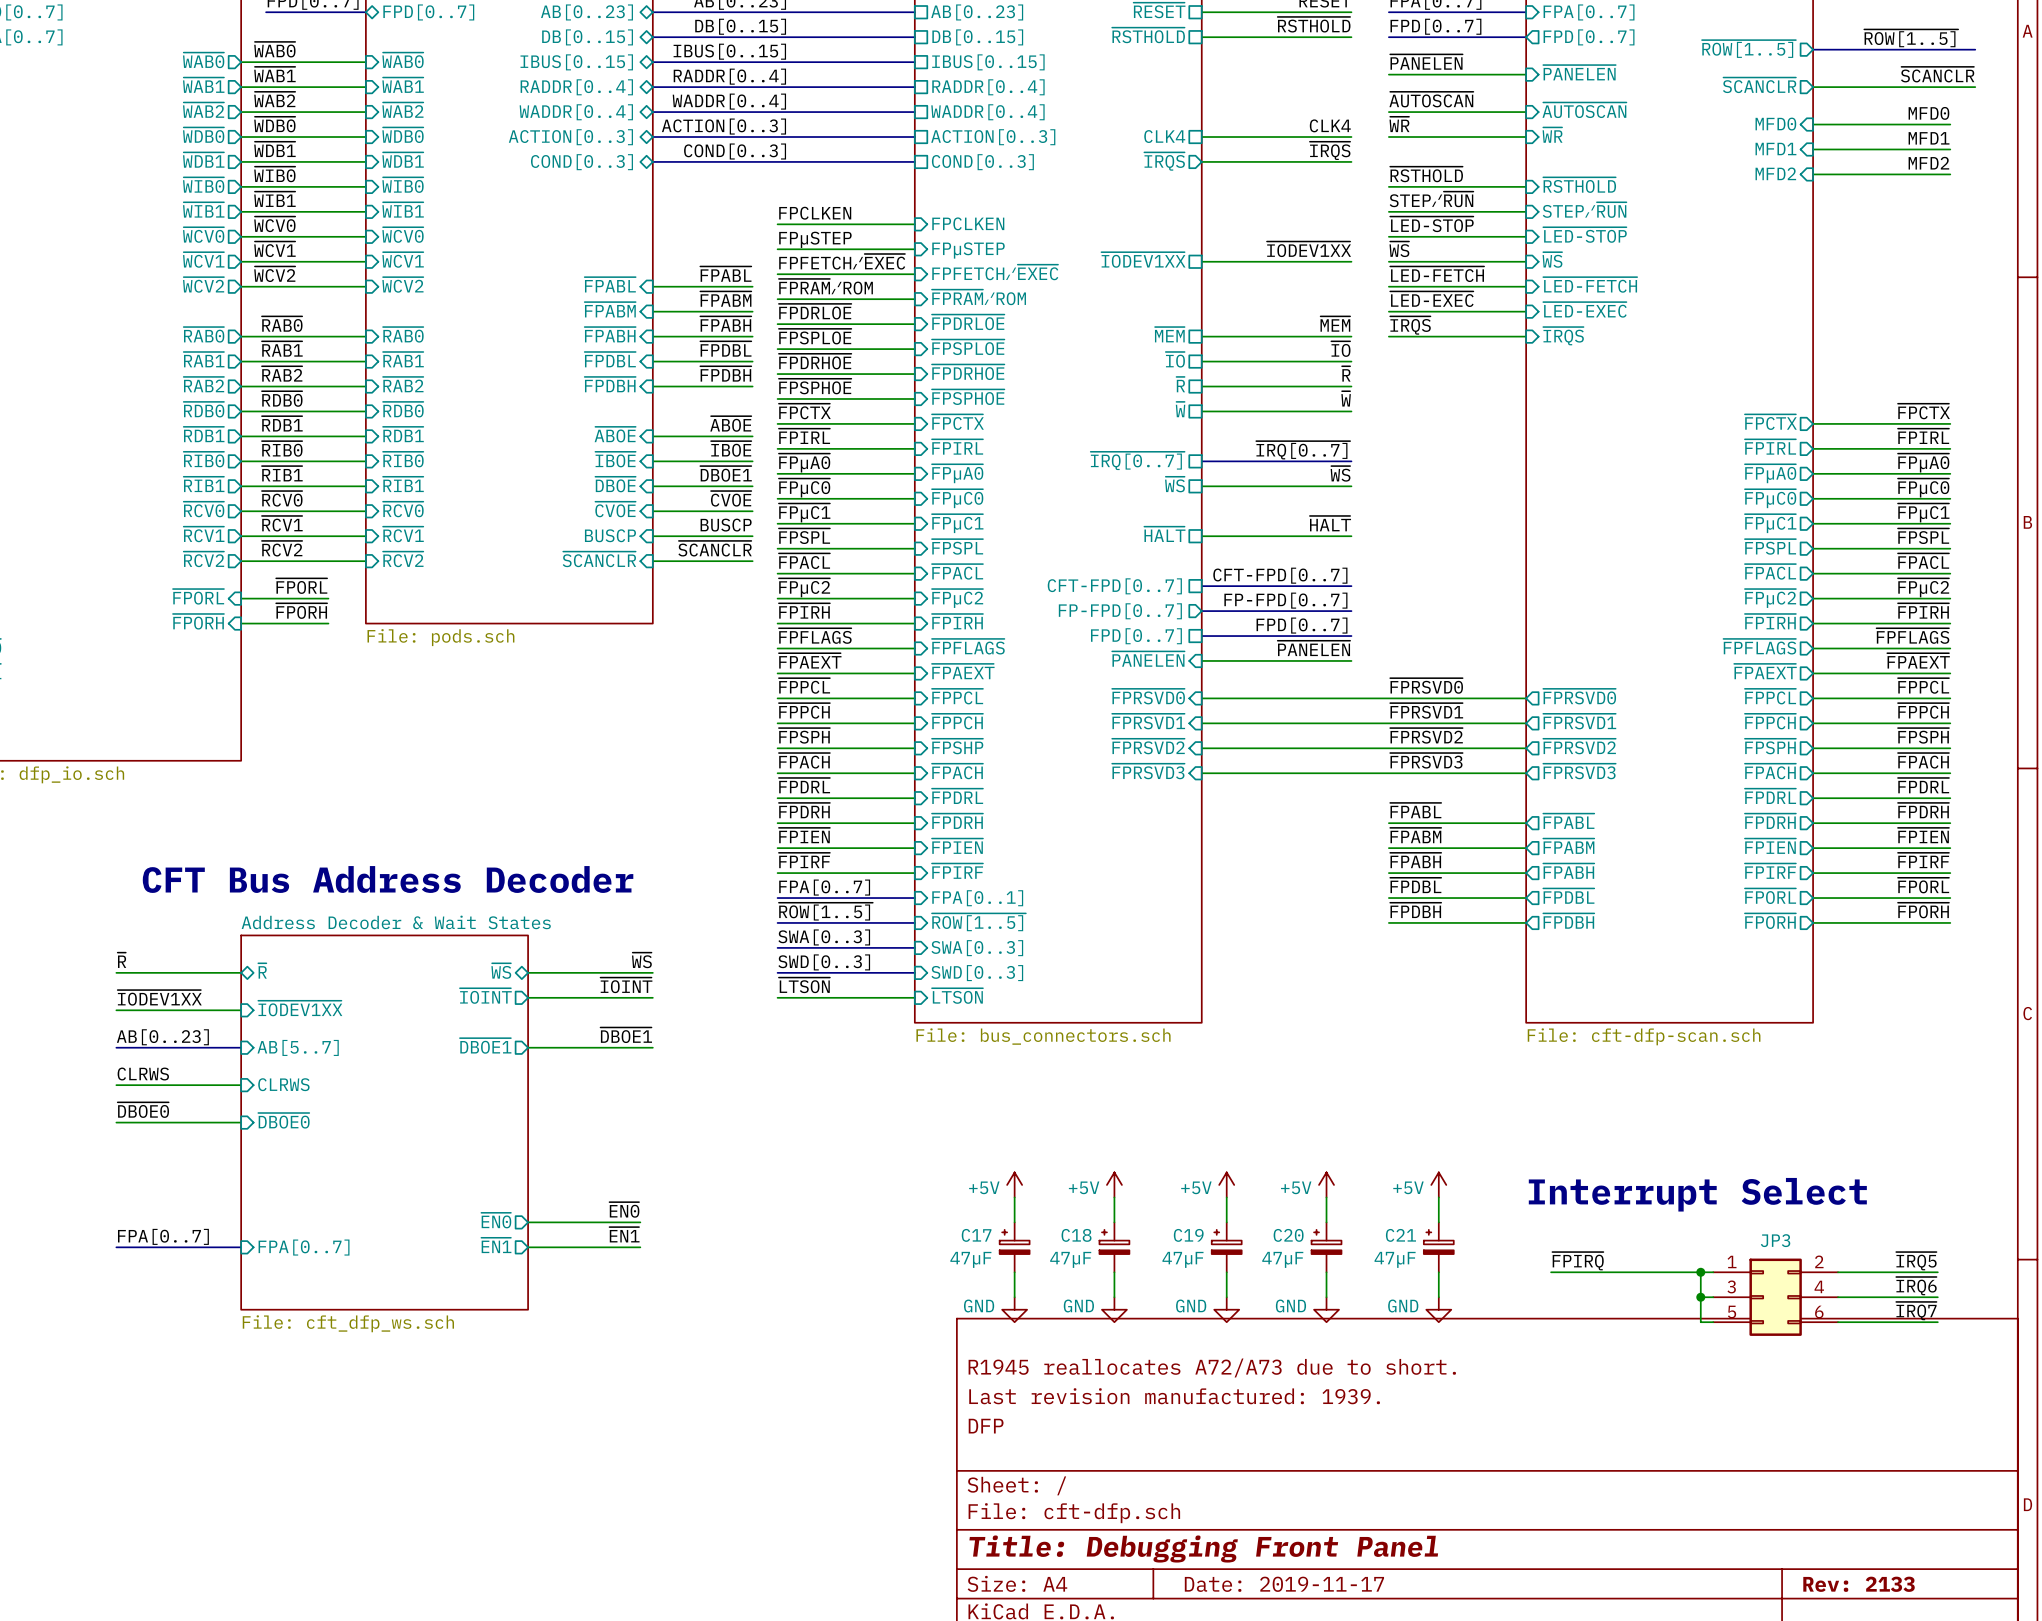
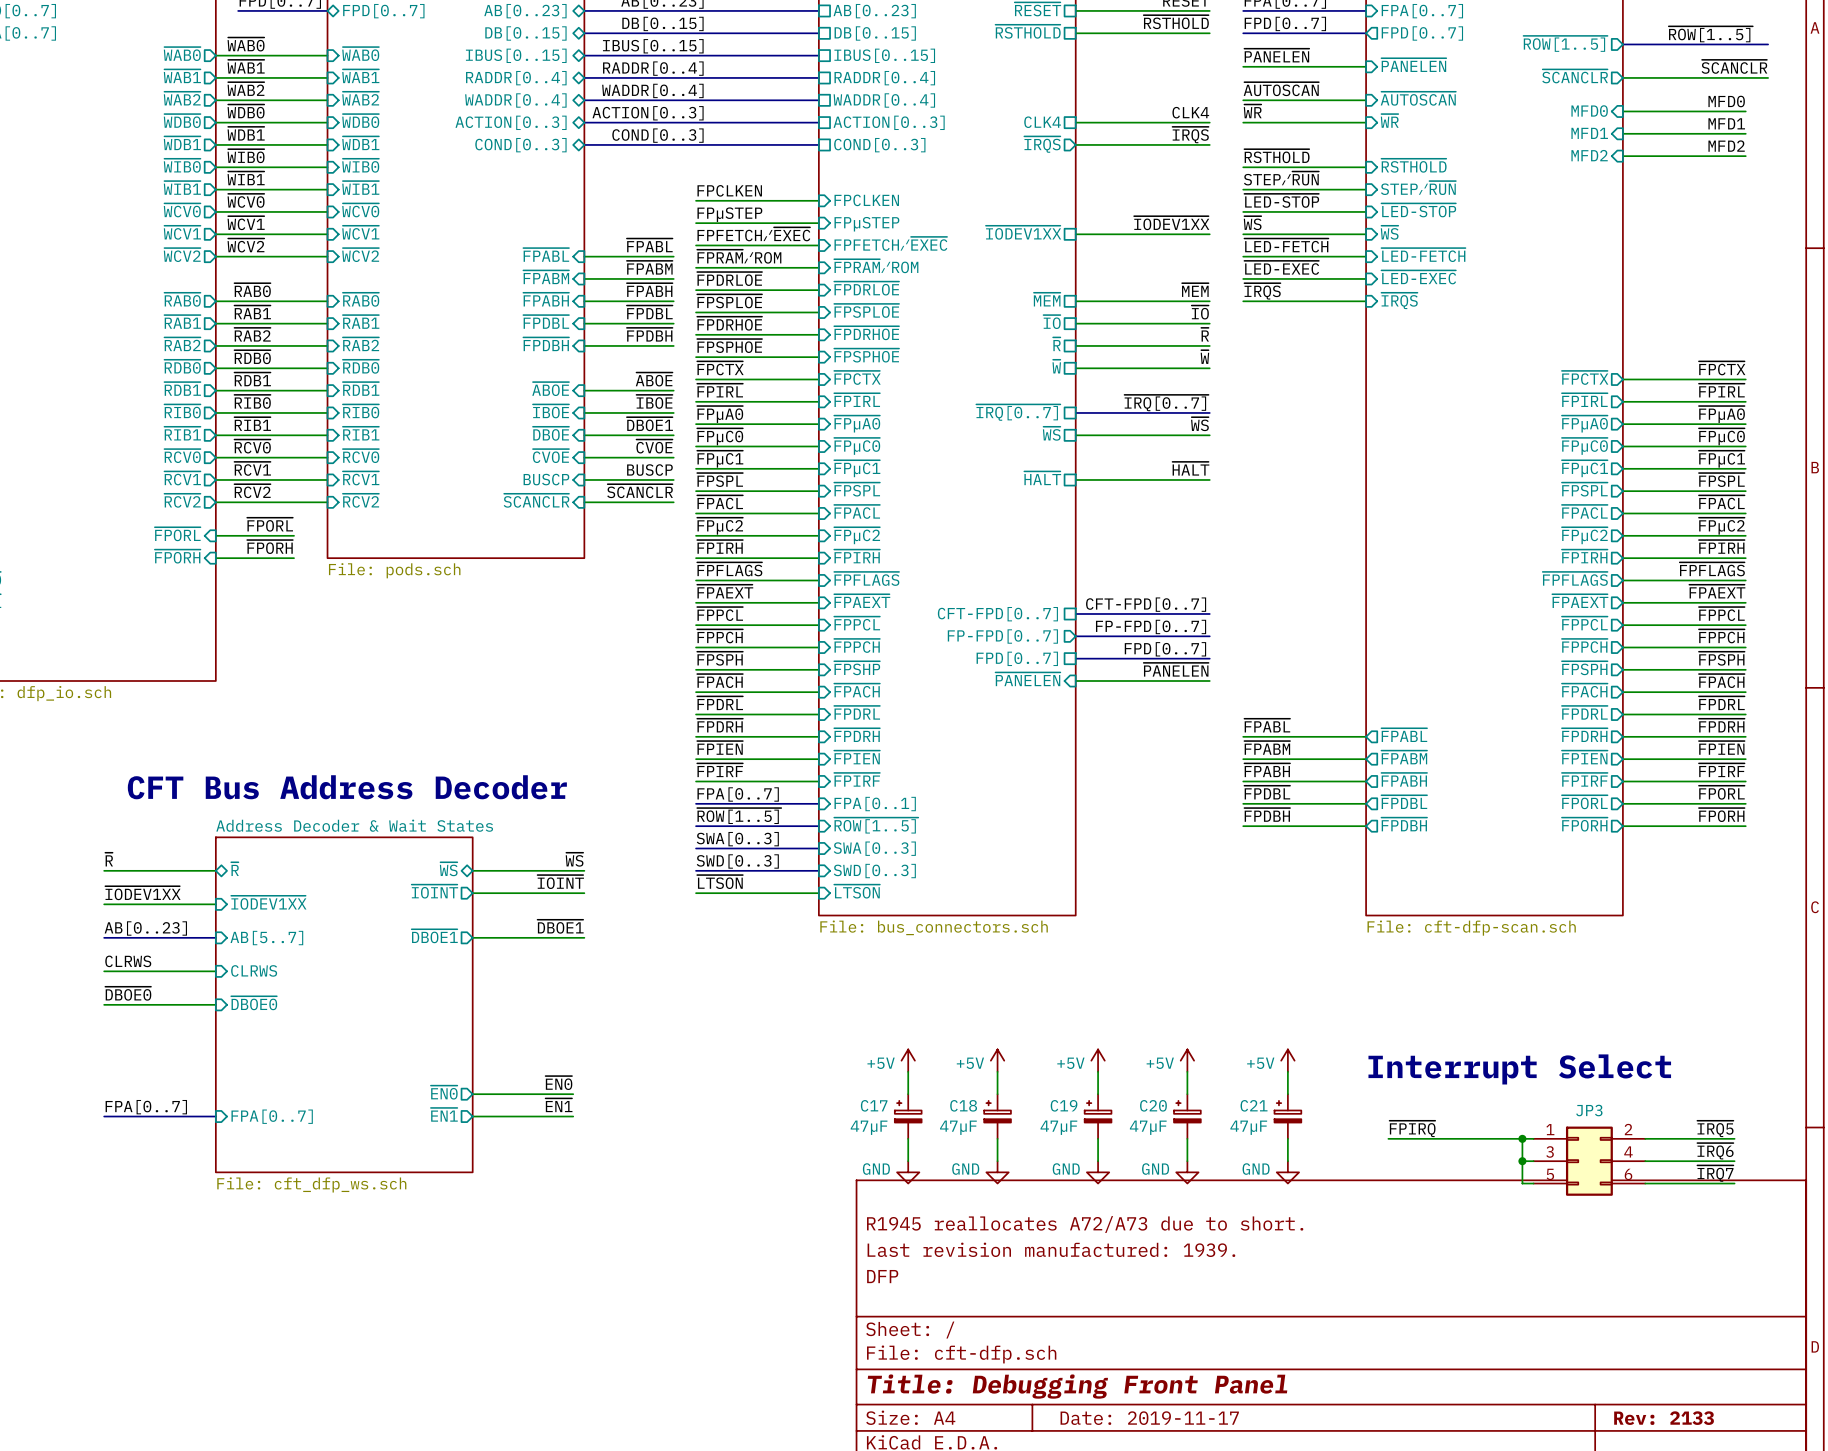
label position: CFT-FPD[0..7] (1280, 575) -> CFT-FPD[0..7] (1146, 604)
sheet pin position: CFT-FPD[0..7] (1114, 586) -> CFT-FPD[0..7] (997, 614)
bus: (1201, 586) (1351, 586) -> (1075, 613) (1209, 613)
label position: FP-FPD[0..7] (1285, 600) -> FP-FPD[0..7] (1151, 626)
sheet pin position: FP-FPD[0..7] (1120, 611) -> FP-FPD[0..7] (1002, 636)
bus: (1201, 611) (1351, 611) -> (1075, 636) (1209, 636)
label position: FPD[0..7] (1302, 625) -> FPD[0..7] (1165, 649)
sheet pin position: FPD[0..7] (1136, 636) -> FPD[0..7] (1017, 658)
bus: (1201, 636) (1351, 636) -> (1075, 658) (1209, 658)
label position: ~{PANELEN} (1313, 648) -> ~{PANELEN} (1176, 669)
sheet pin position: ~{PANELEN} (1148, 659) -> ~{PANELEN} (1027, 679)
wire: (1201, 660) (1351, 660) -> (1075, 680) (1209, 680)
label: ~{FPRSVD0} (1426, 685) -> none
sheet pin: ~{FPRSVD0} (1148, 696) -> none
sheet pin: ~{FPRSVD0} (1579, 696) -> none
wire: (1201, 698) (1526, 698) -> none
label: ~{FPRSVD1} (1426, 710) -> none
sheet pin: ~{FPRSVD1} (1148, 721) -> none
sheet pin: ~{FPRSVD1} (1579, 721) -> none
wire: (1201, 723) (1526, 723) -> none
label: ~{FPRSVD2} (1426, 735) -> none
sheet pin: ~{FPRSVD2} (1148, 746) -> none
sheet pin: ~{FPRSVD2} (1579, 746) -> none
wire: (1201, 748) (1526, 748) -> none
label: ~{FPRSVD3} (1426, 760) -> none
sheet pin: ~{FPRSVD3} (1148, 771) -> none
sheet pin: ~{FPRSVD3} (1579, 771) -> none
wire: (1201, 773) (1526, 773) -> none

